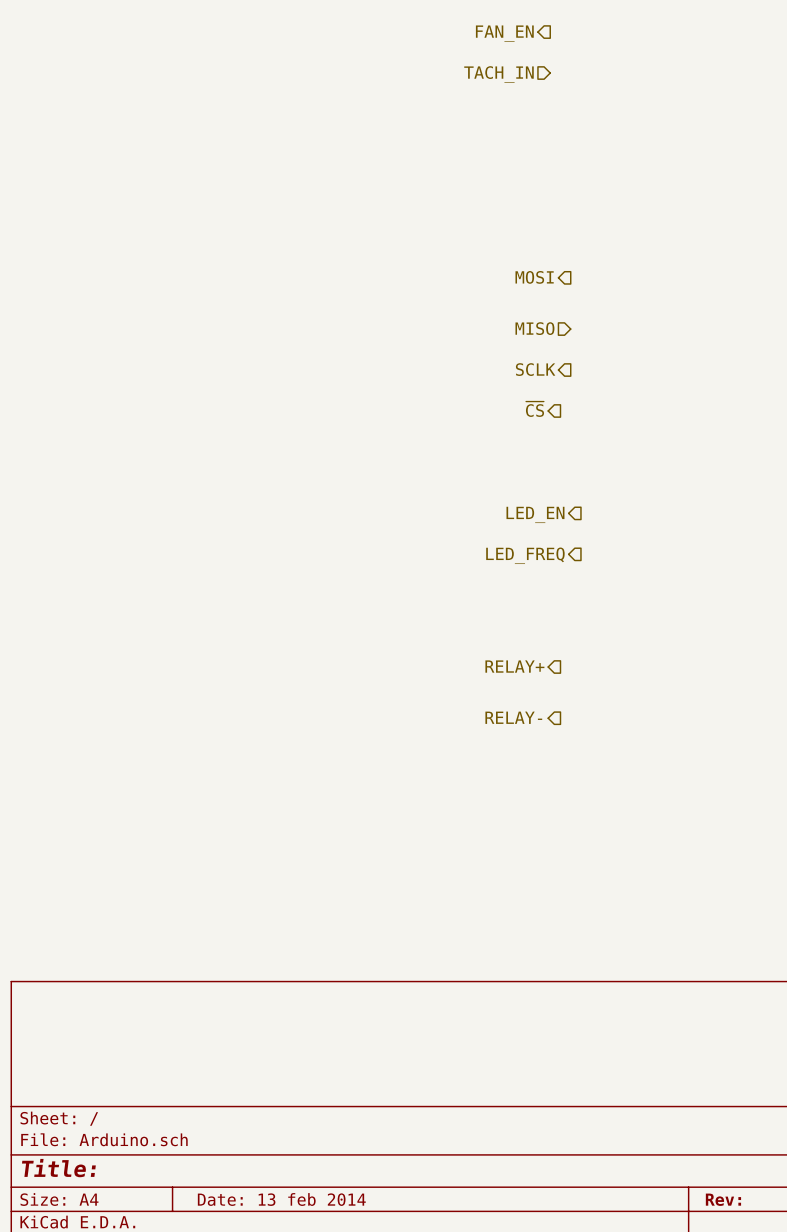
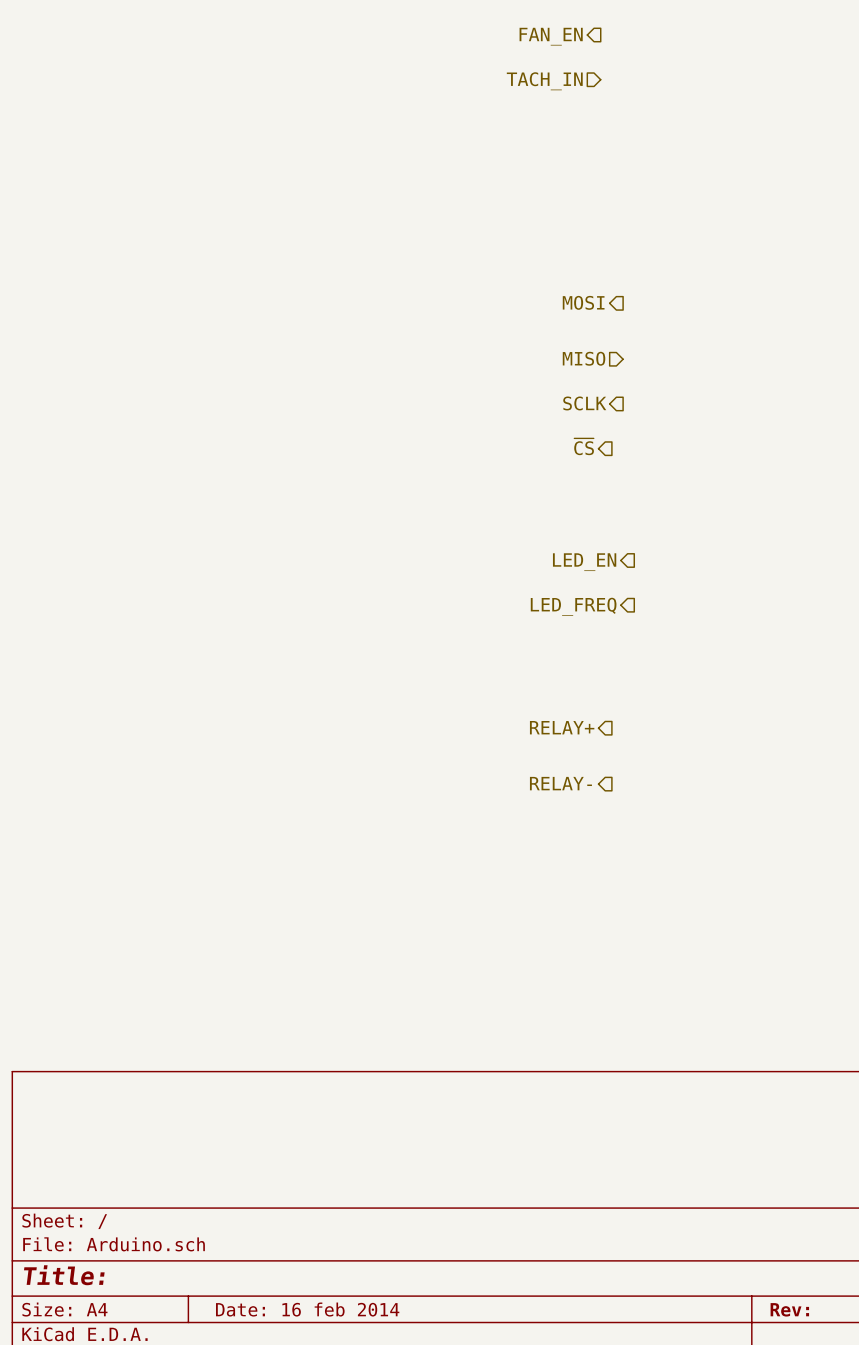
title block: Date: 13 feb 2014 (281, 1199) -> Date: 16 feb 2014 (307, 1309)

